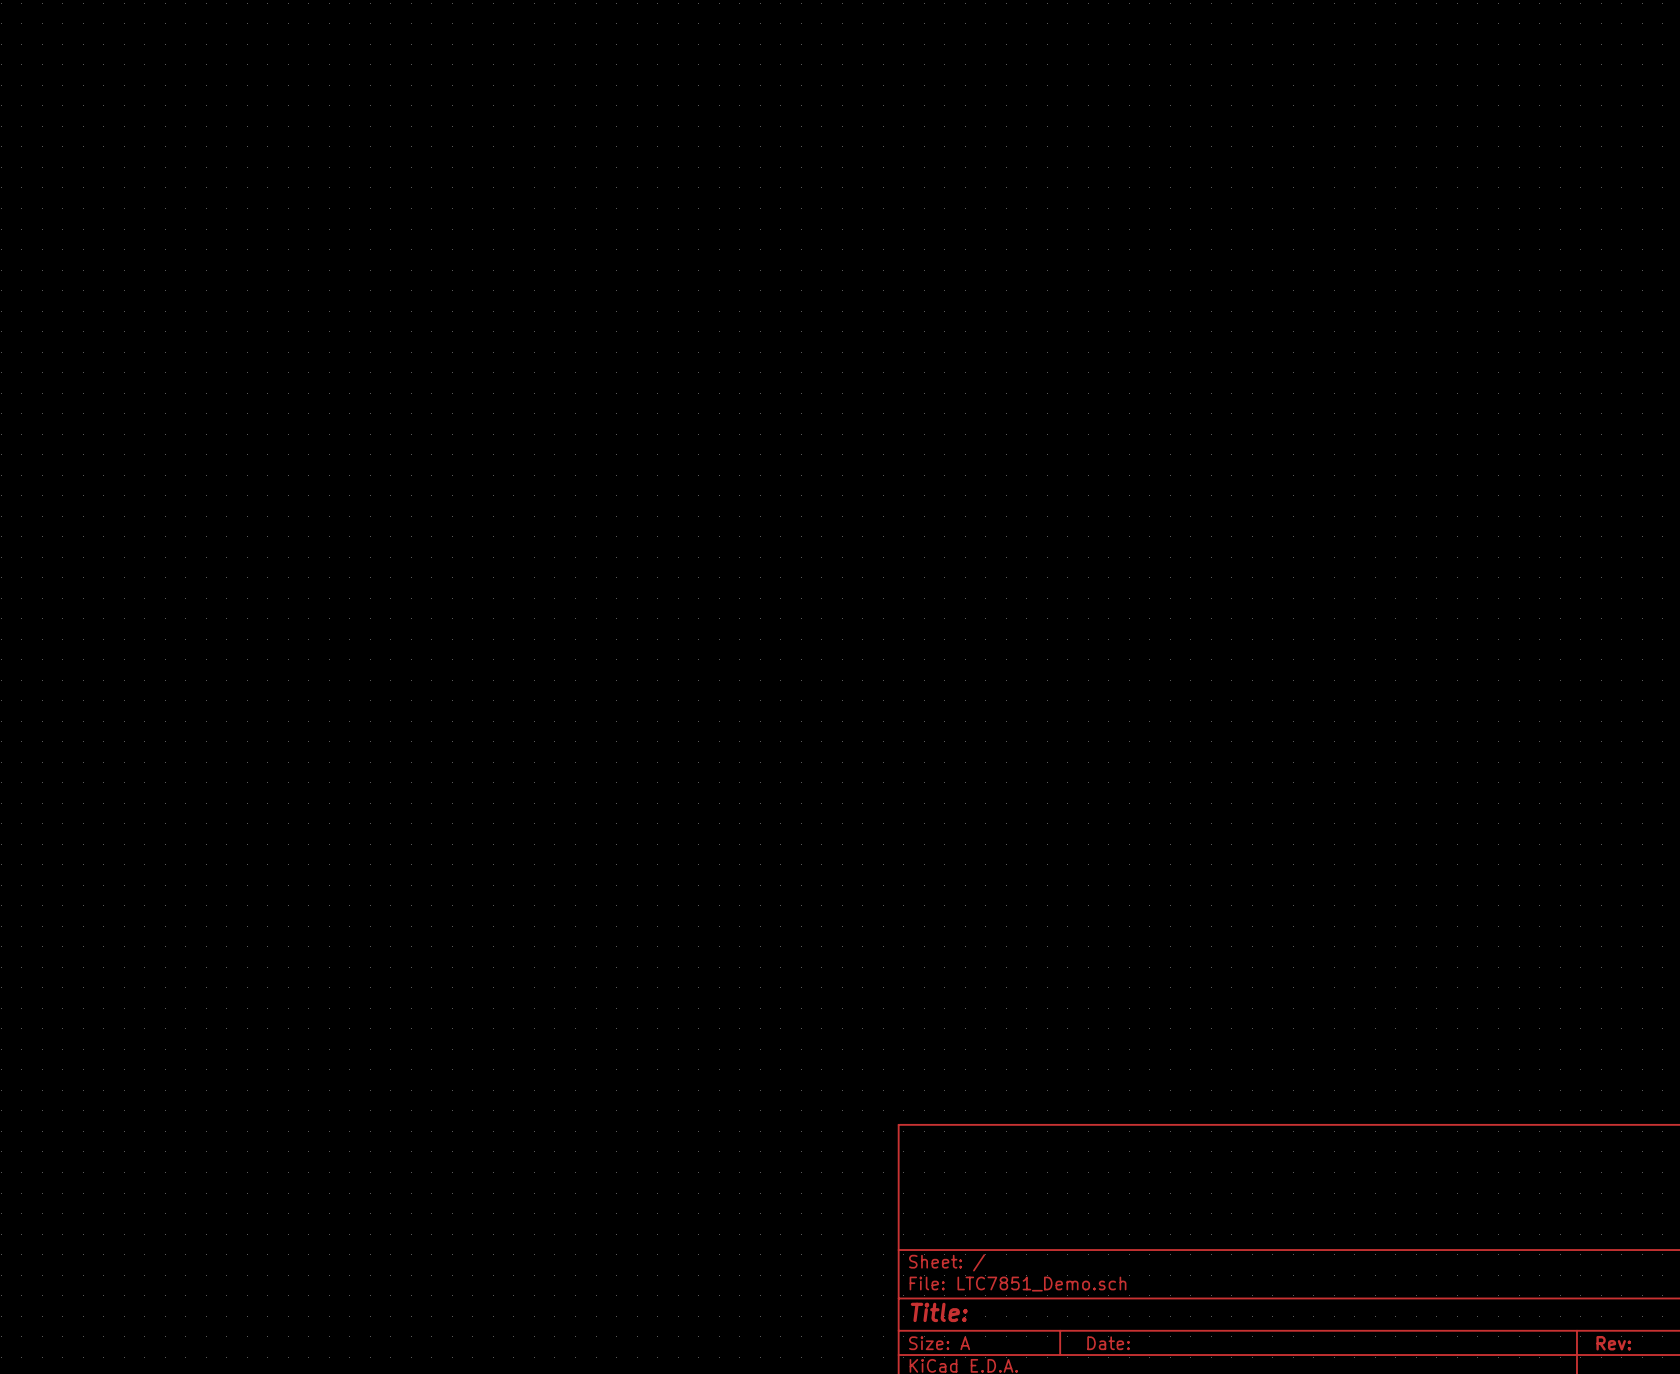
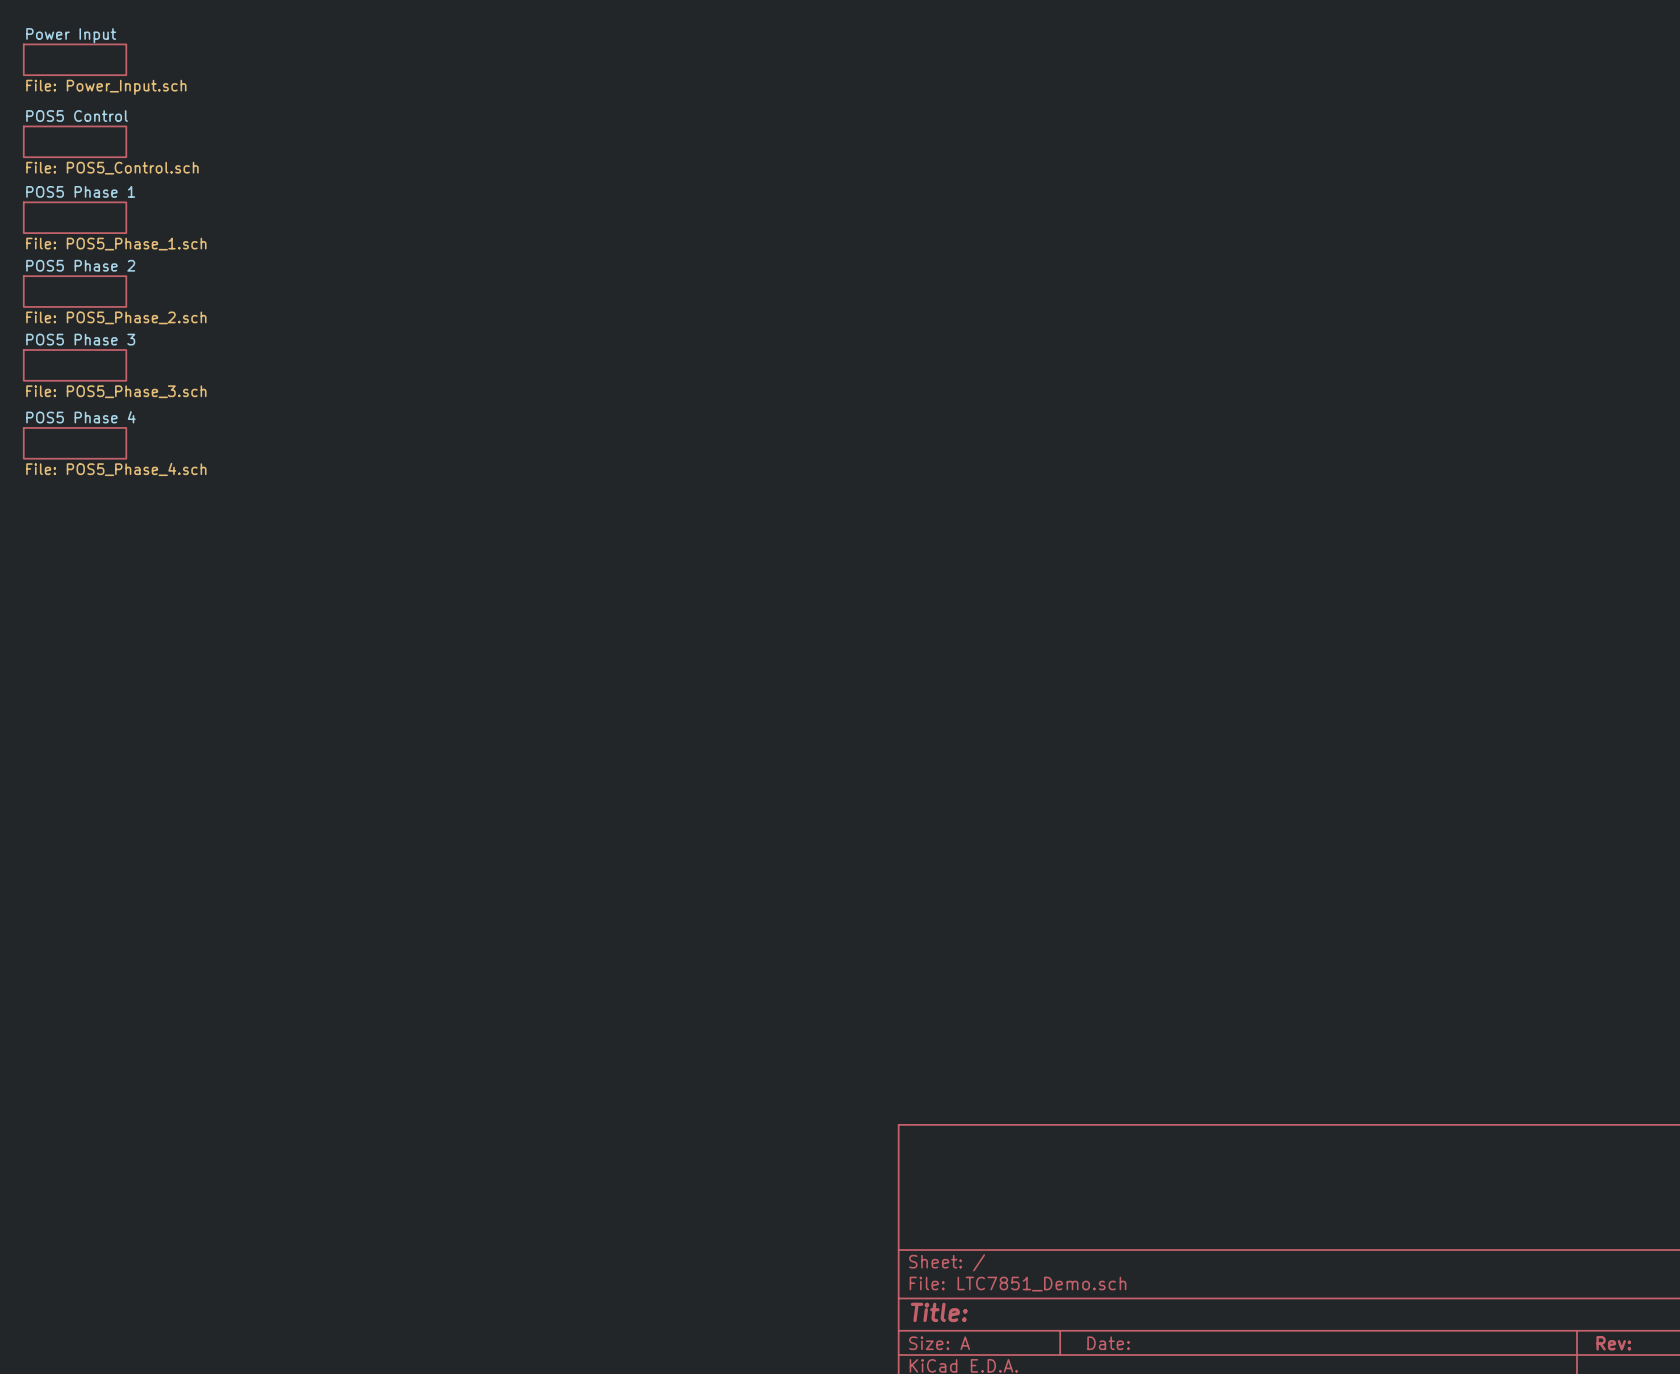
sheet Power Input: none -> File: Power_Input.sch (75, 59)
sheet POS5 Control: none -> File: POS5_Control.sch (75, 141)
sheet POS5 Phase 1: none -> File: POS5_Phase_1.sch (75, 217)
sheet POS5 Phase 2: none -> File: POS5_Phase_2.sch (75, 291)
sheet POS5 Phase 3: none -> File: POS5_Phase_3.sch (75, 365)
sheet POS5 Phase 4: none -> File: POS5_Phase_4.sch (75, 443)

